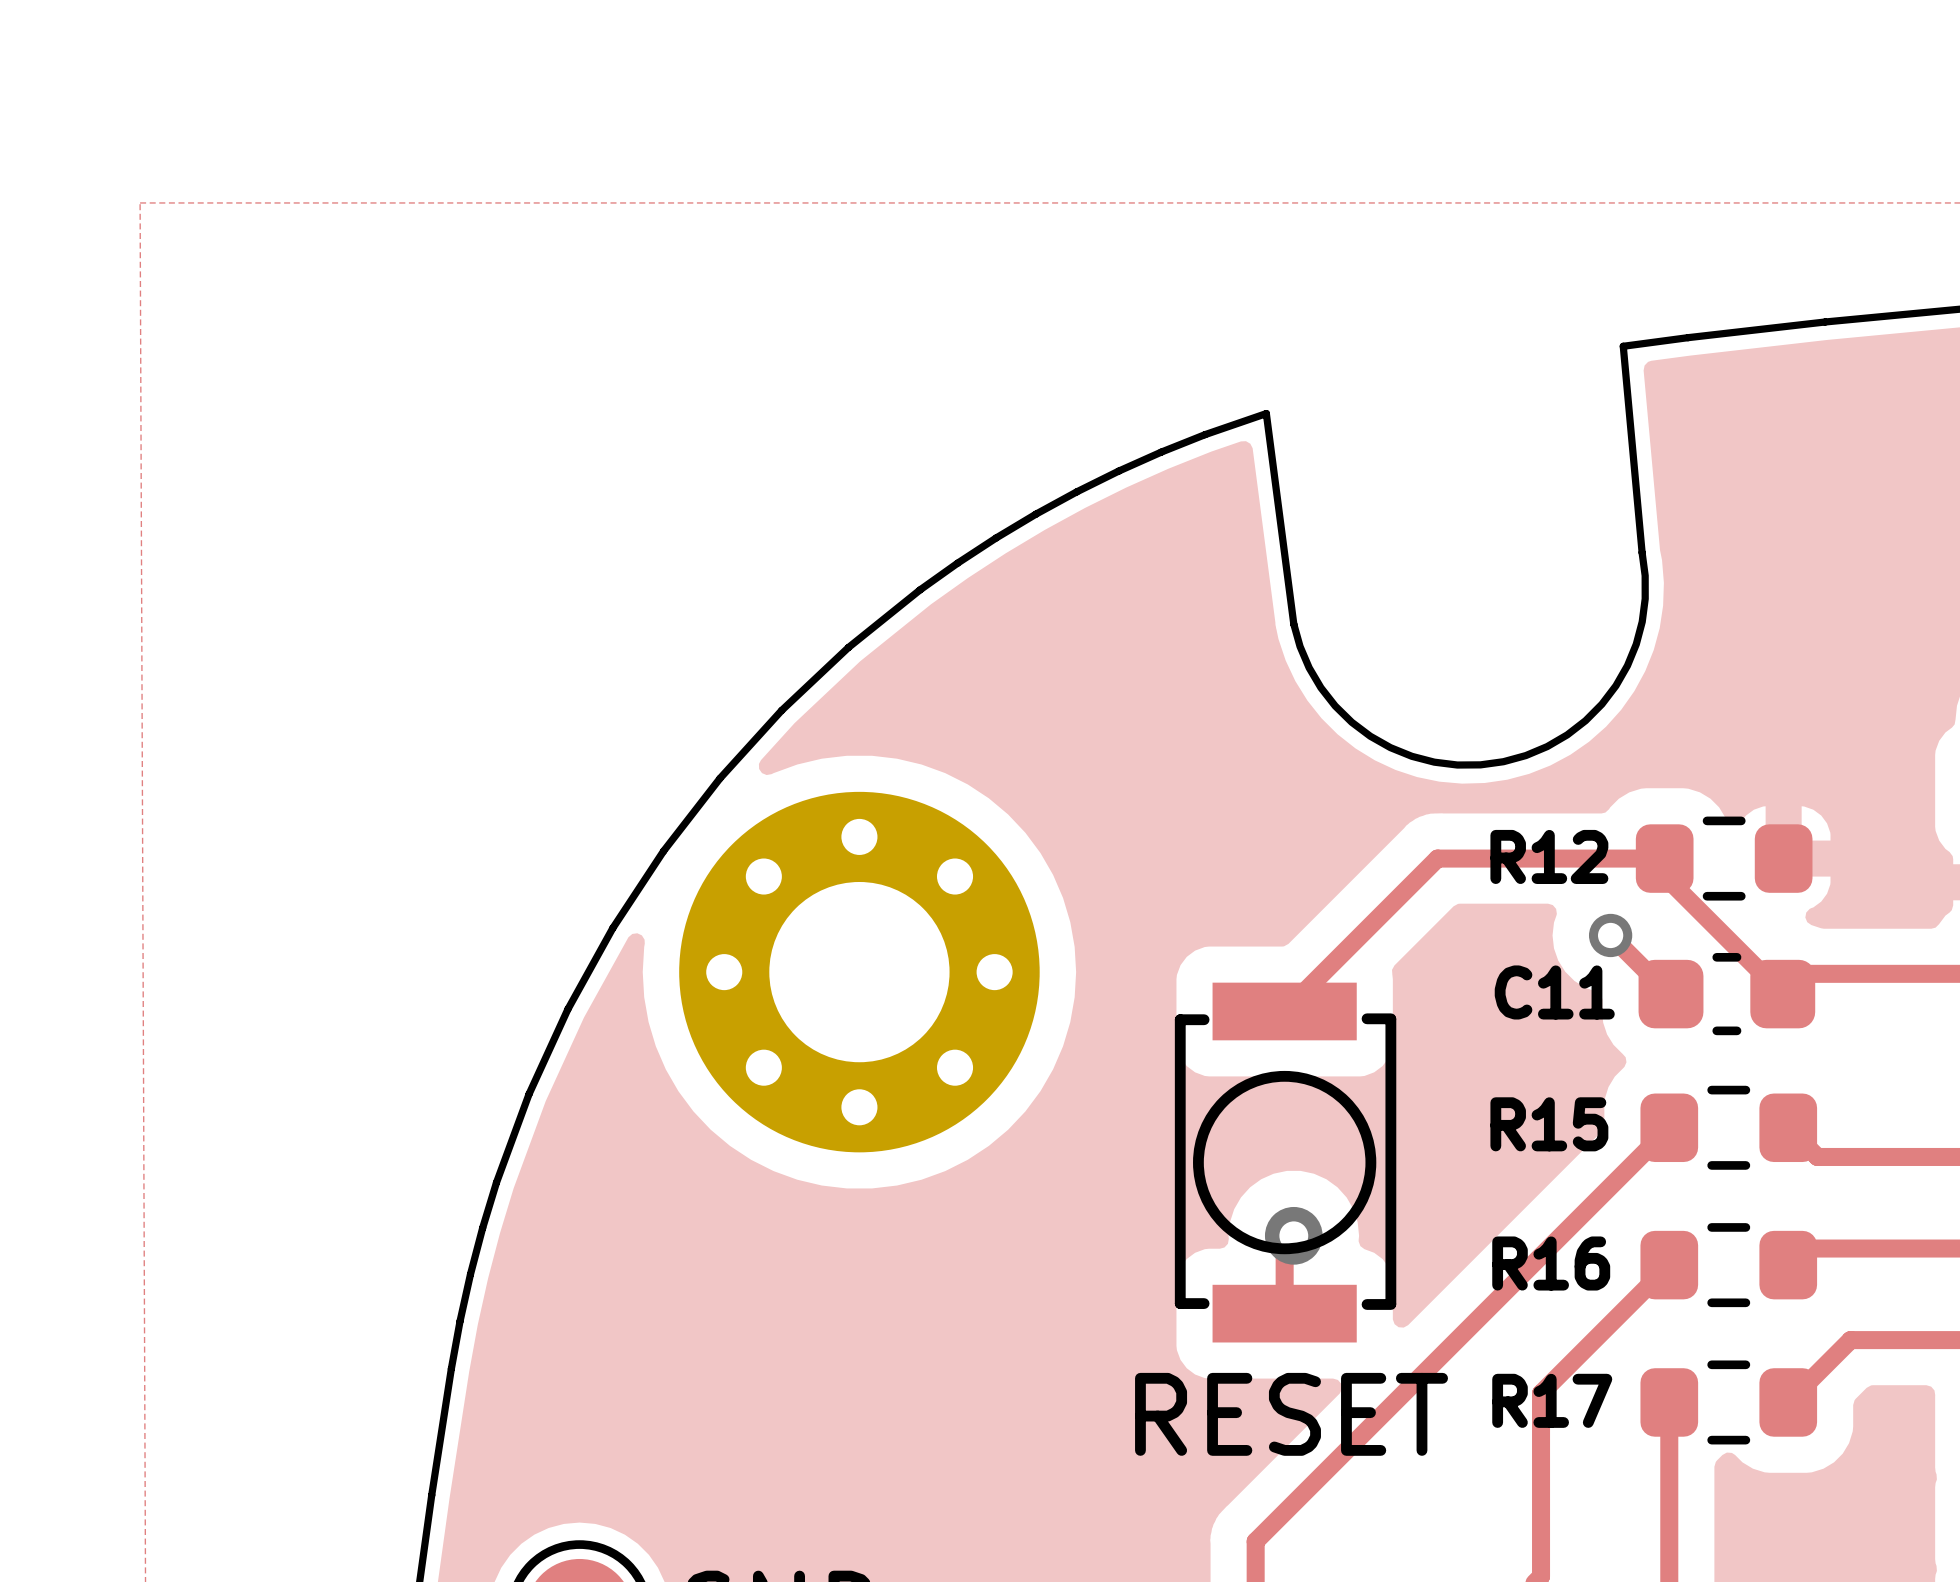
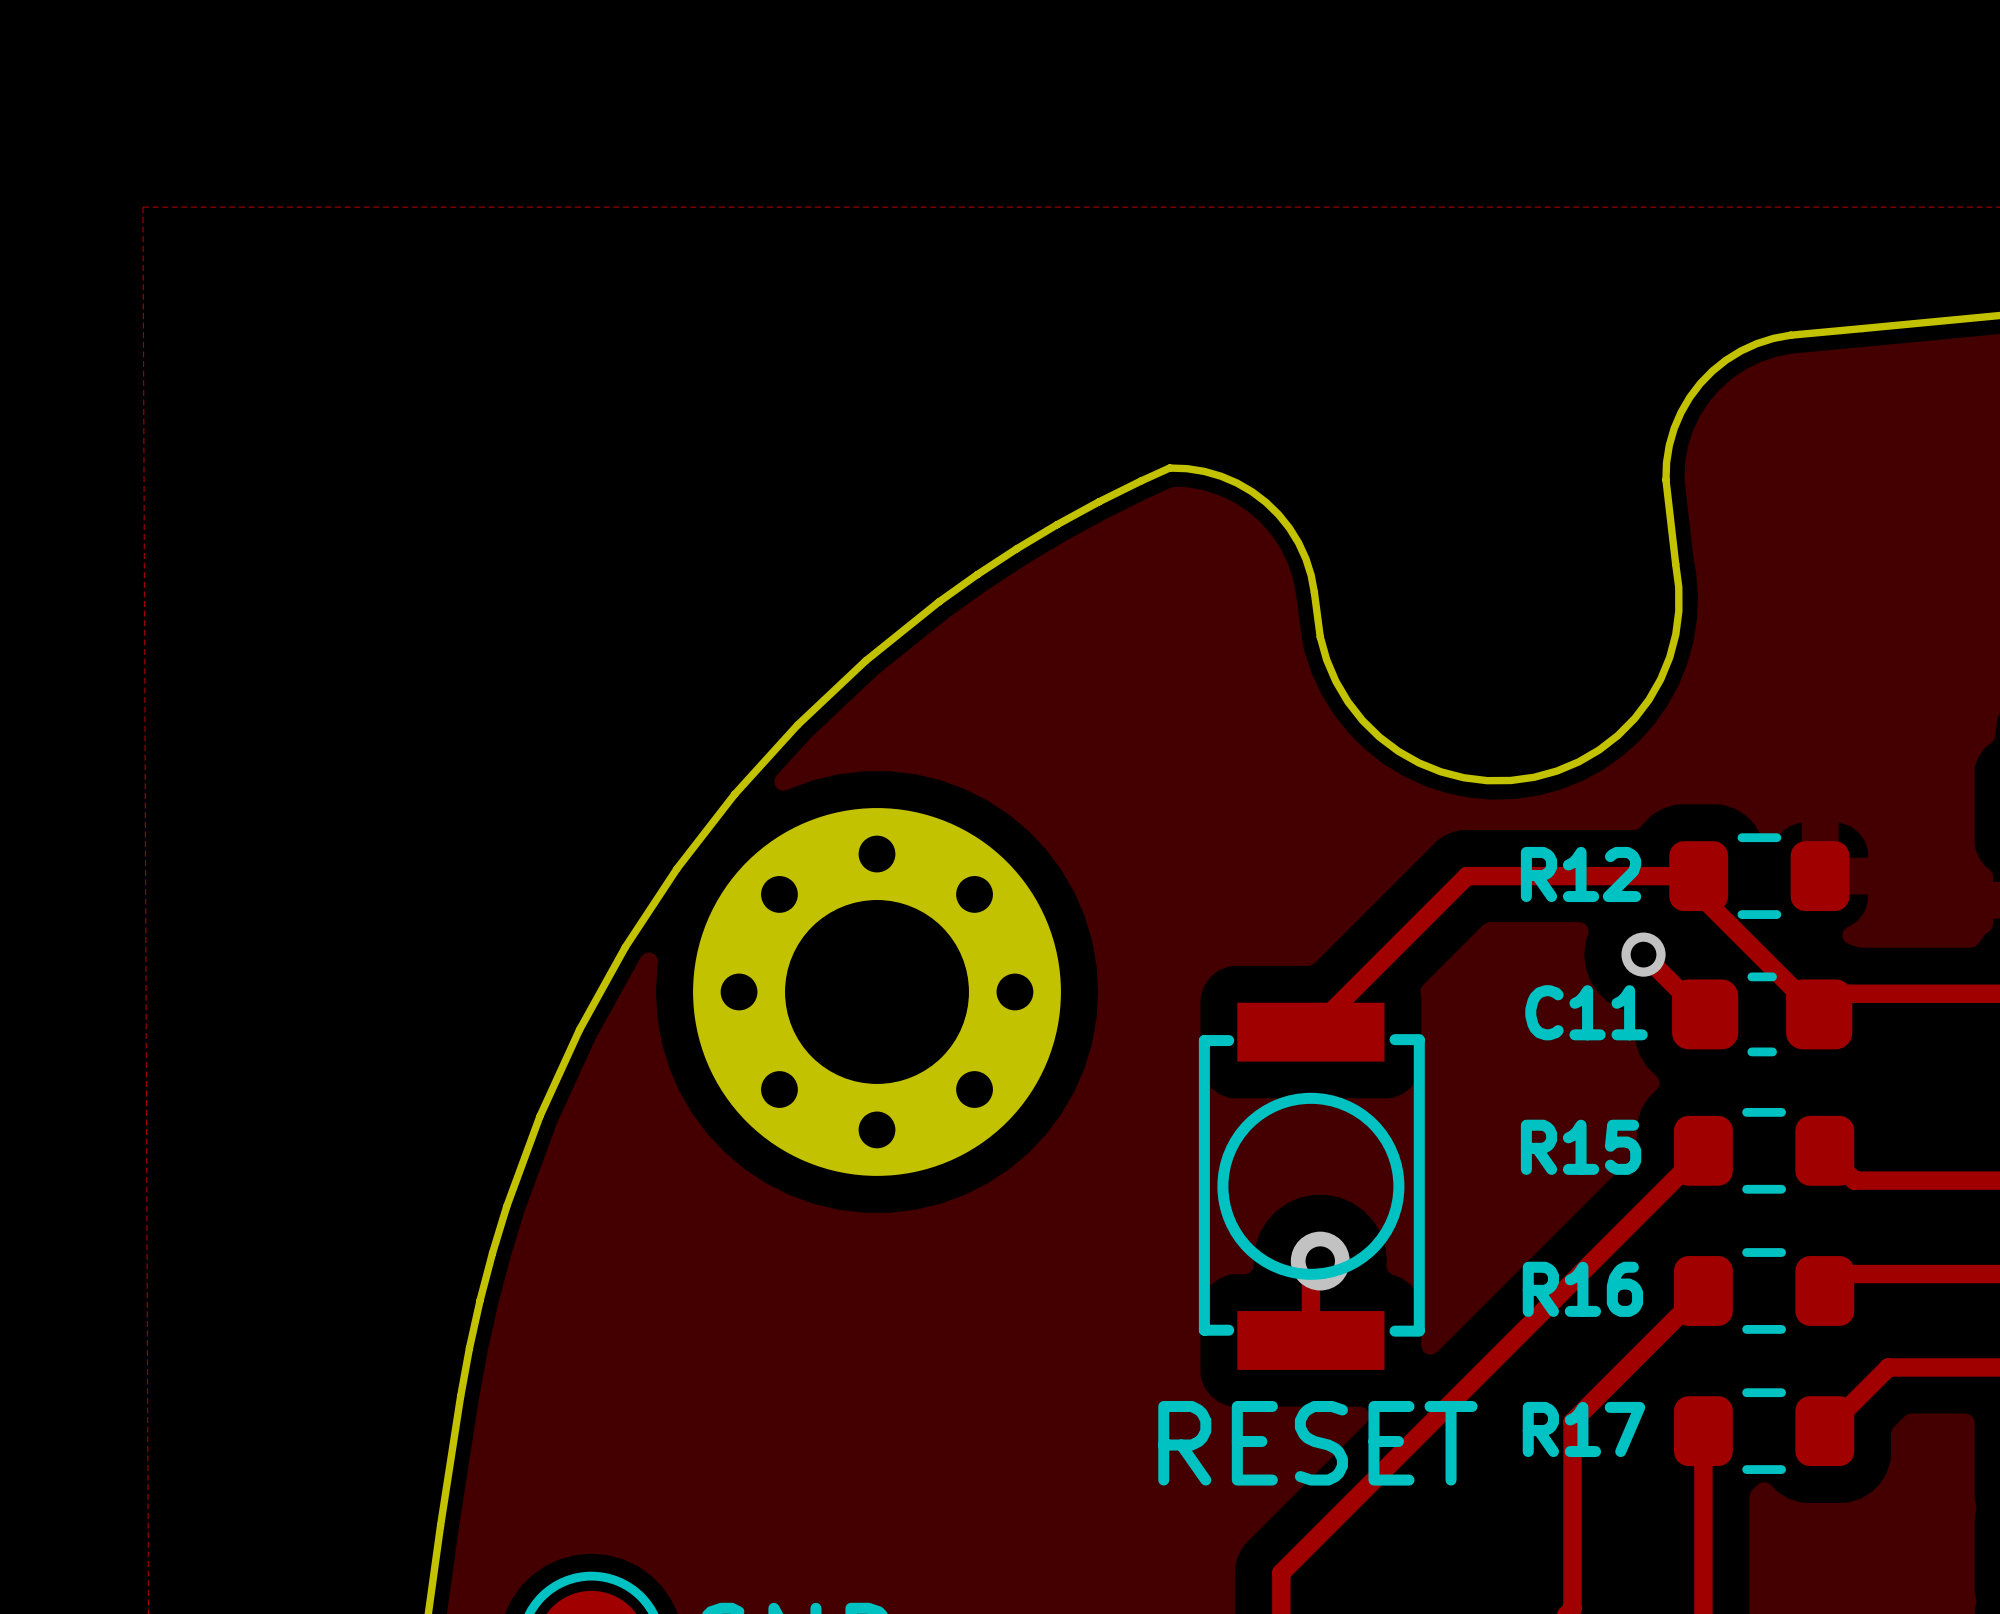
board edge: (1825, 321) (1623, 346) (1642, 552) -> (1862, 328) (1790, 335) (1756, 343) (1726, 360) (1700, 383) (1680, 412) (1674, 428) (1666, 462) (1665, 479) (1675, 563)
board edge: (1118, 471) (1205, 434) (1266, 413) (1293, 624) -> (1141, 480) (1169, 468) (1204, 471) (1237, 483) (1266, 502) (1289, 528) (1305, 558) (1314, 592) (1320, 636)

